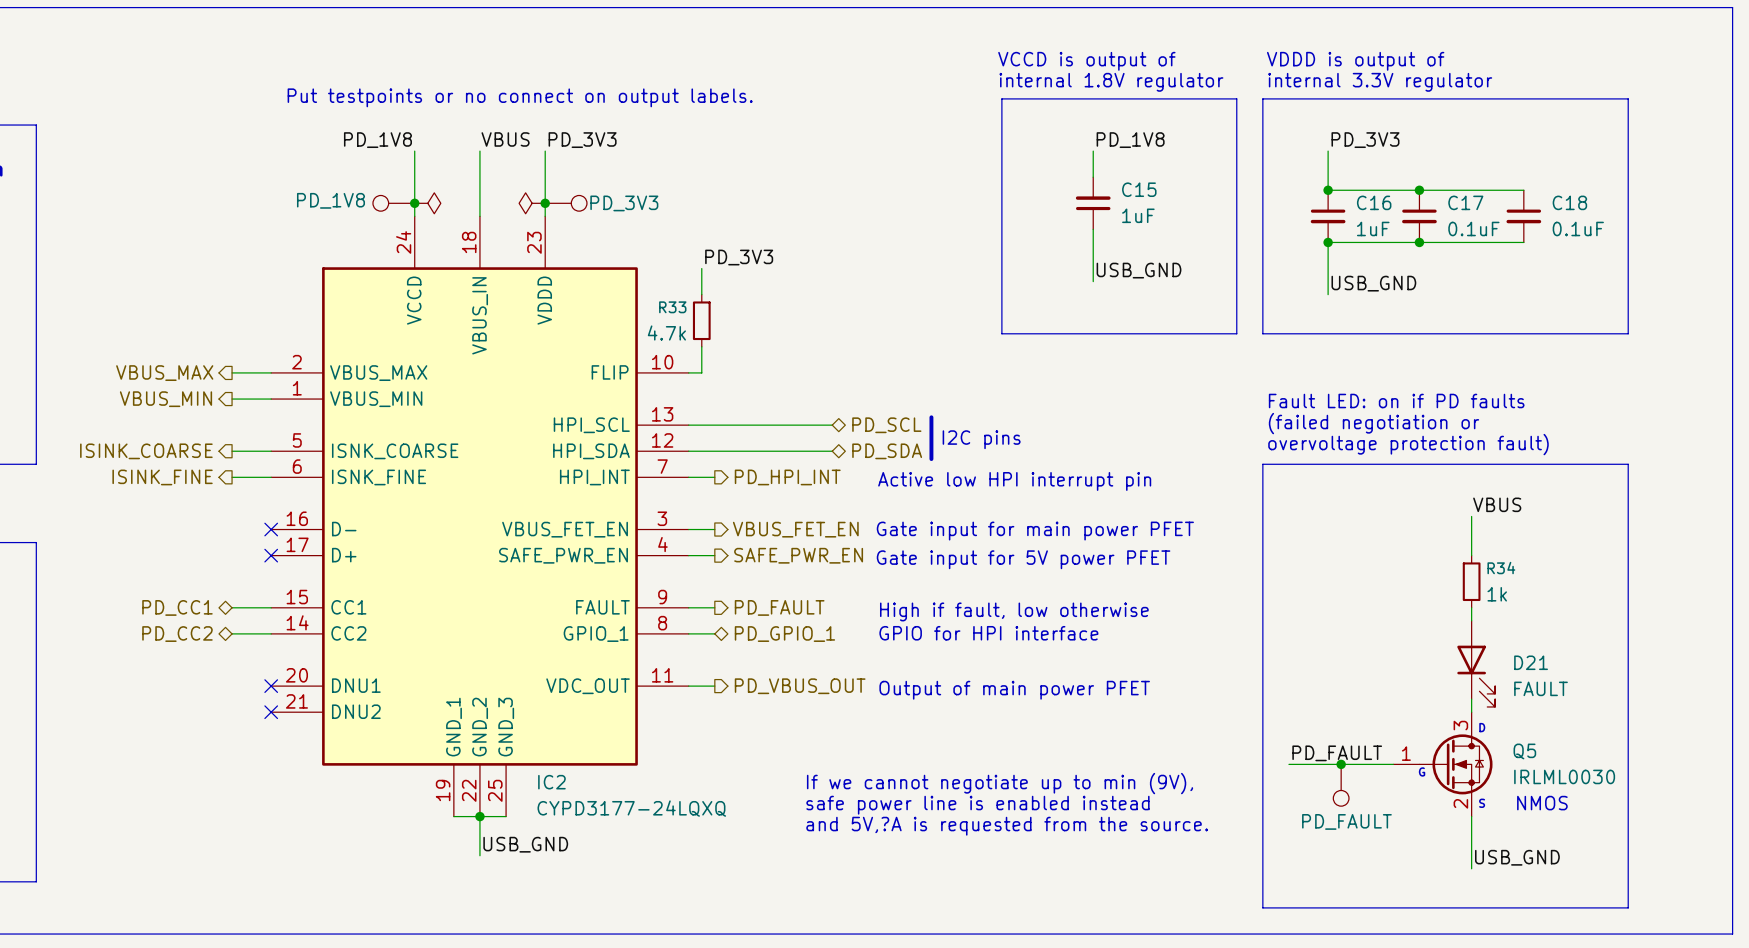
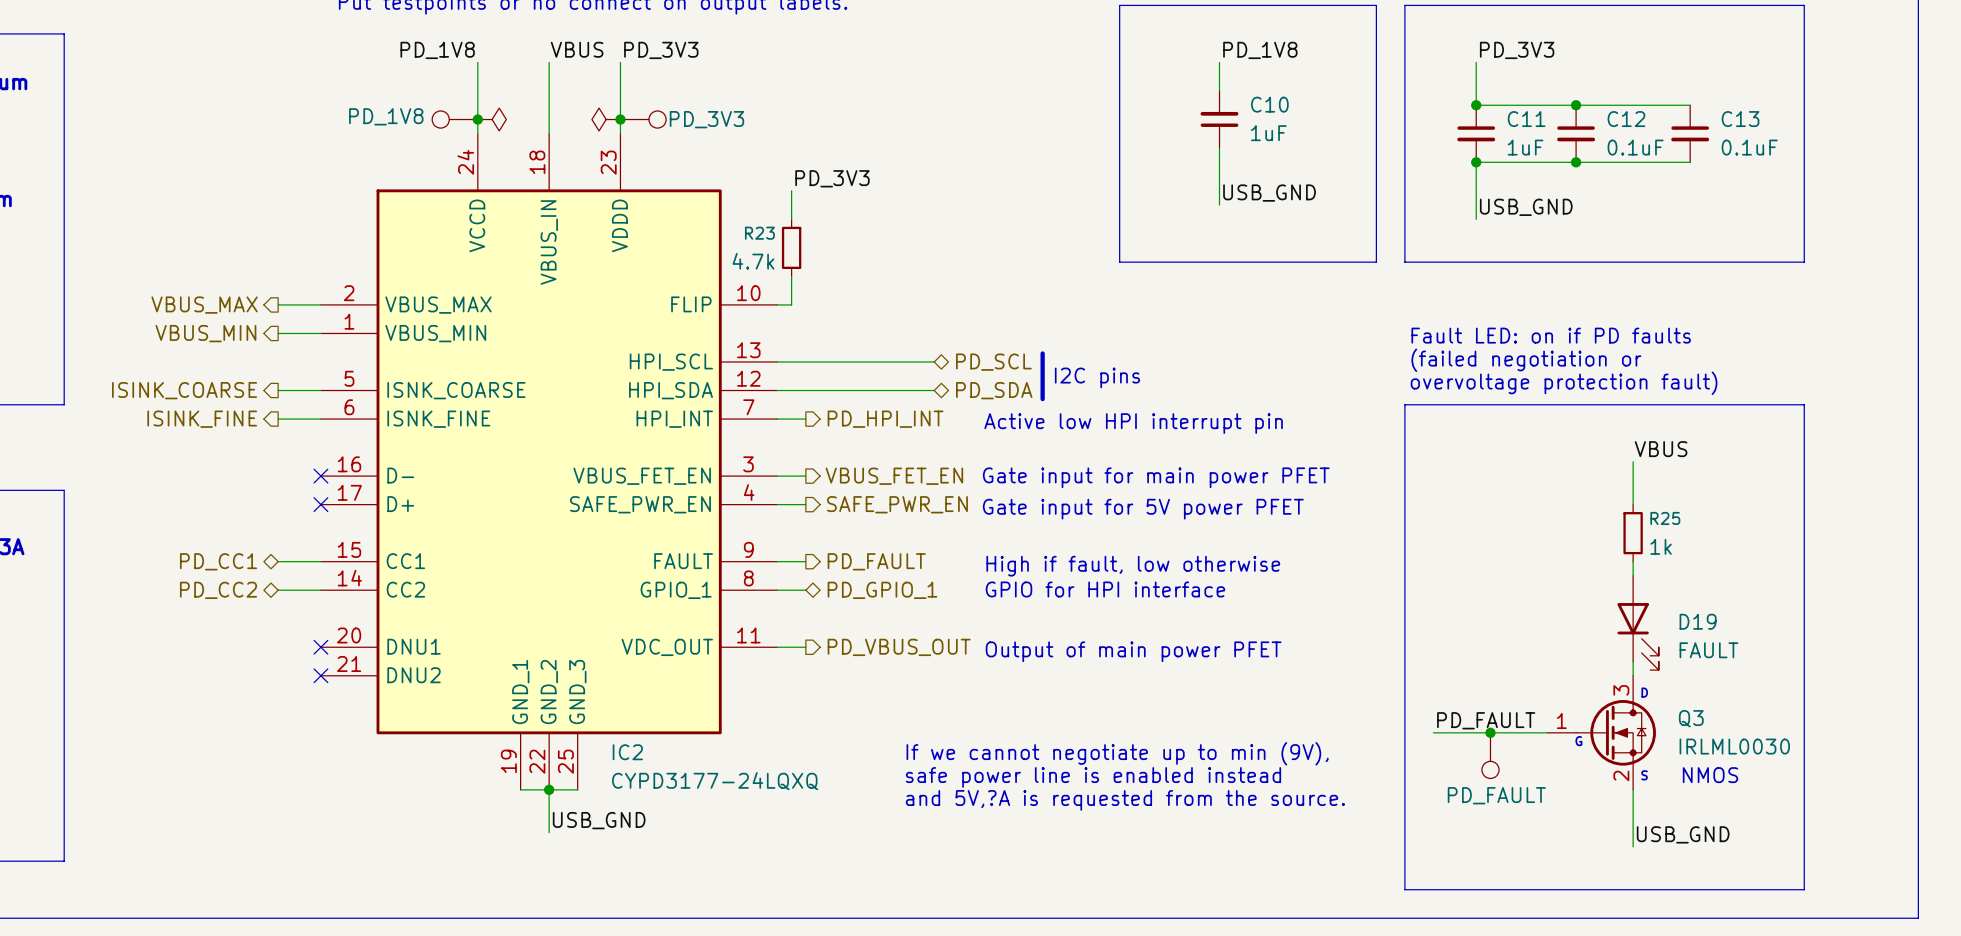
C15 name: C15 (1139, 189) -> C10 (1269, 104)
C16 name: C16 (1374, 202) -> C11 (1526, 119)
C17 name: C17 (1465, 202) -> C12 (1626, 119)
C18 name: C18 (1569, 202) -> C13 (1740, 119)
R33 name: R33 (672, 307) -> R23 (759, 233)
R34 name: R34 (1501, 568) -> R25 (1665, 518)
D21 name: D21 (1531, 662) -> D19 (1698, 621)
Q5 name: Q5 (1524, 751) -> Q3 (1691, 718)

